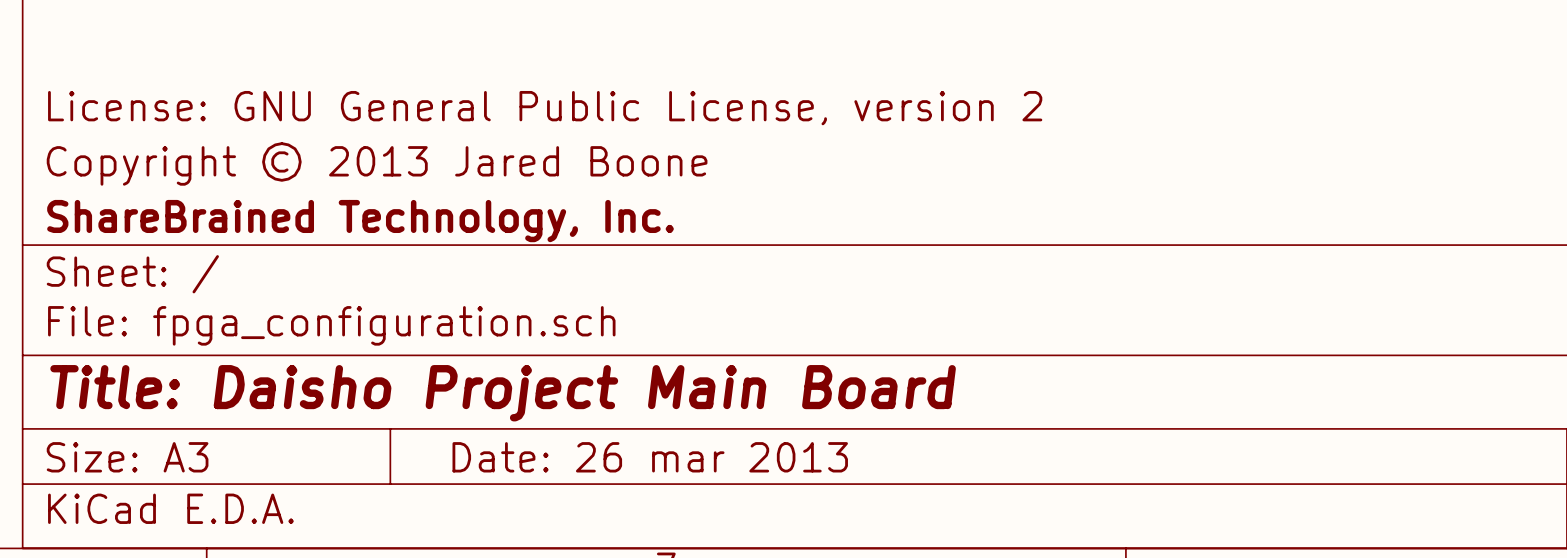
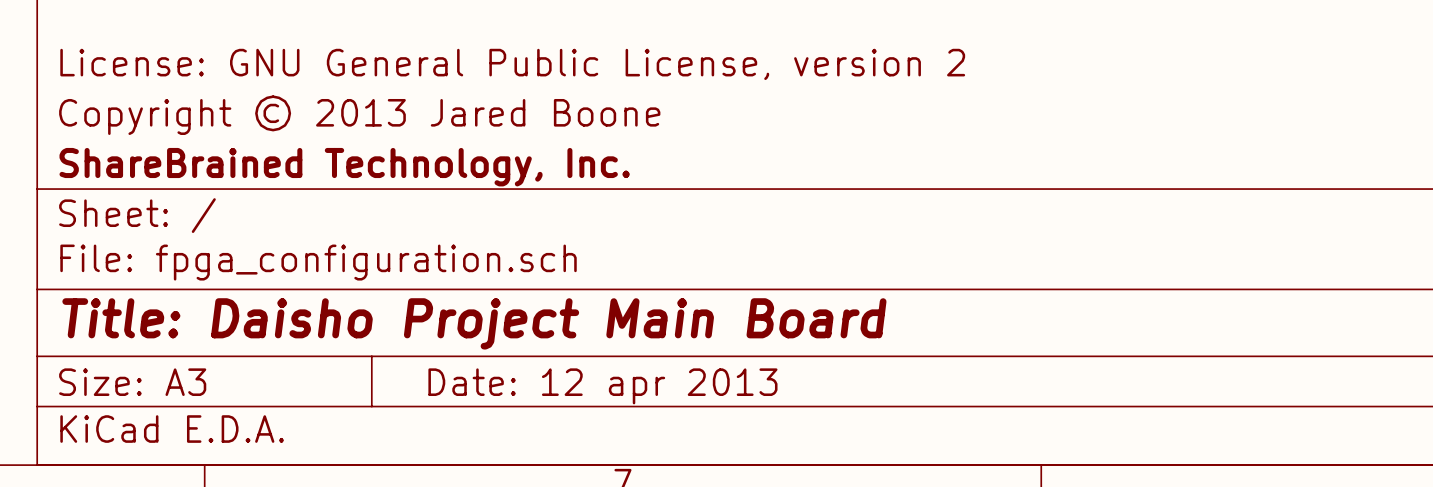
title block: Date: 26 mar 2013 (650, 457) -> Date: 12 apr 2013 (602, 386)

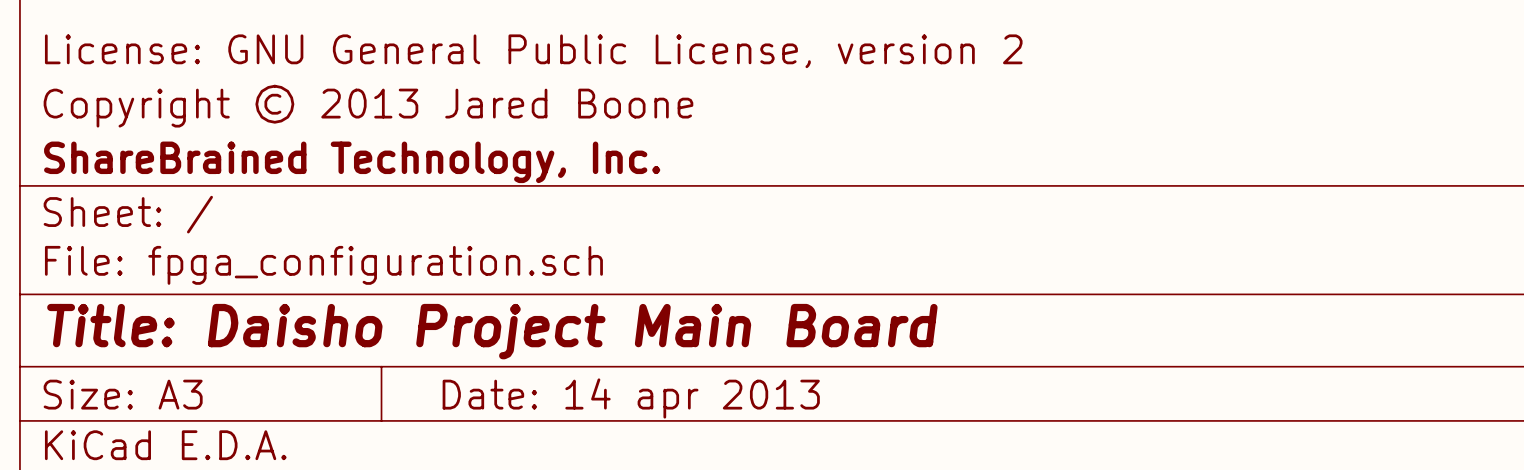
title block: Date: 12 apr 2013 (602, 386) -> Date: 14 apr 2013 (631, 398)

